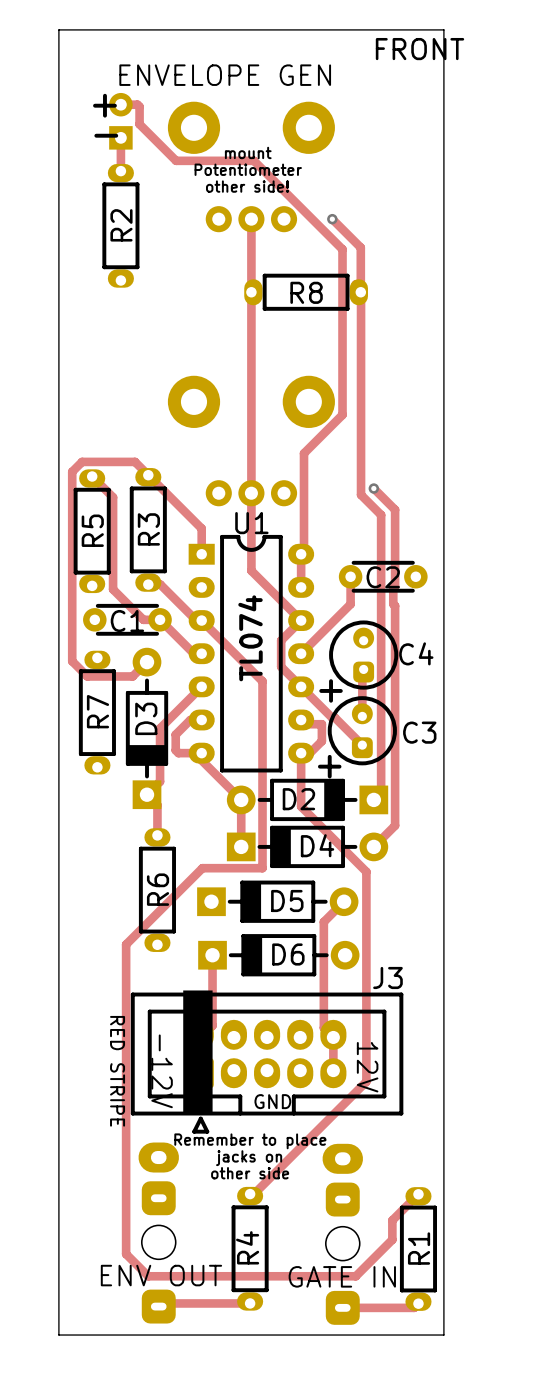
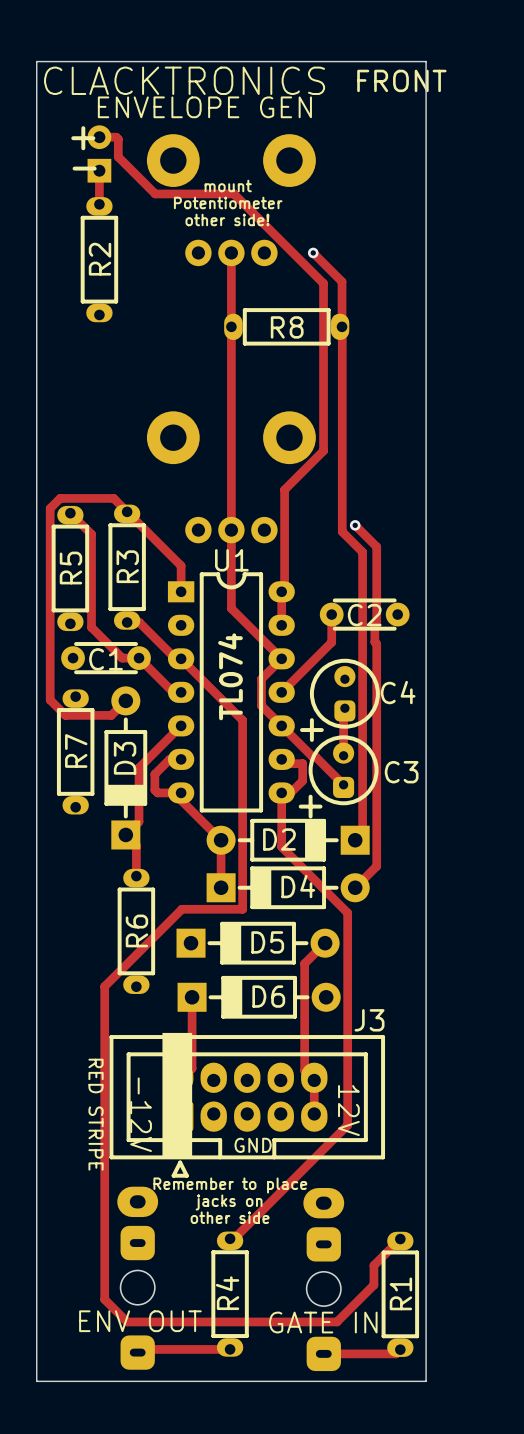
text: none -> CLACKTRONICS (184, 80)

